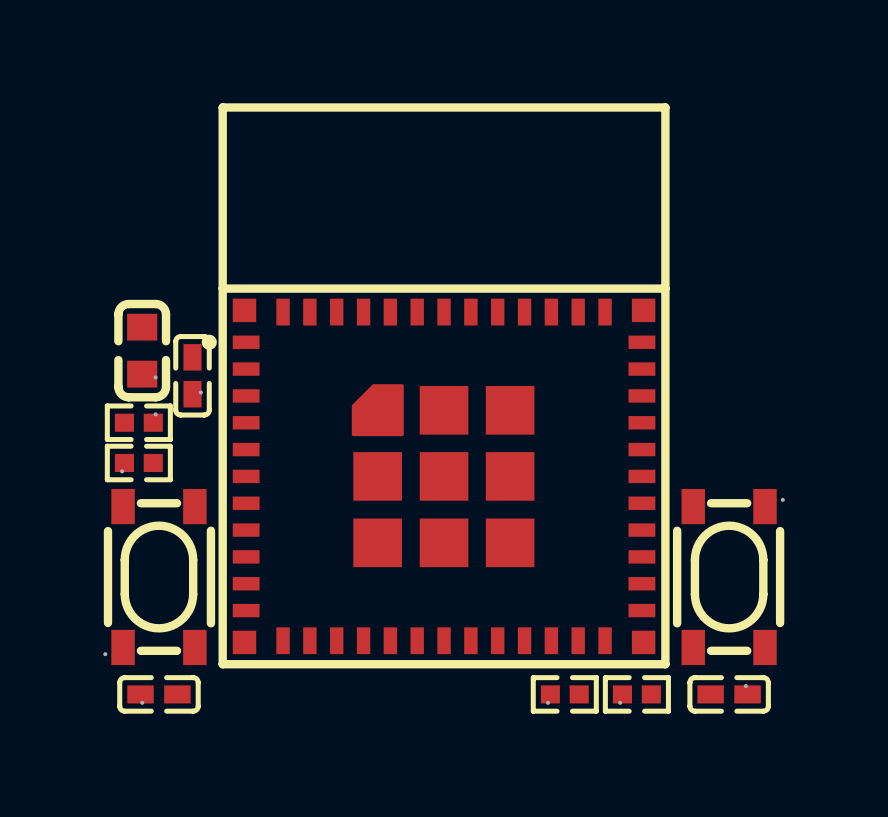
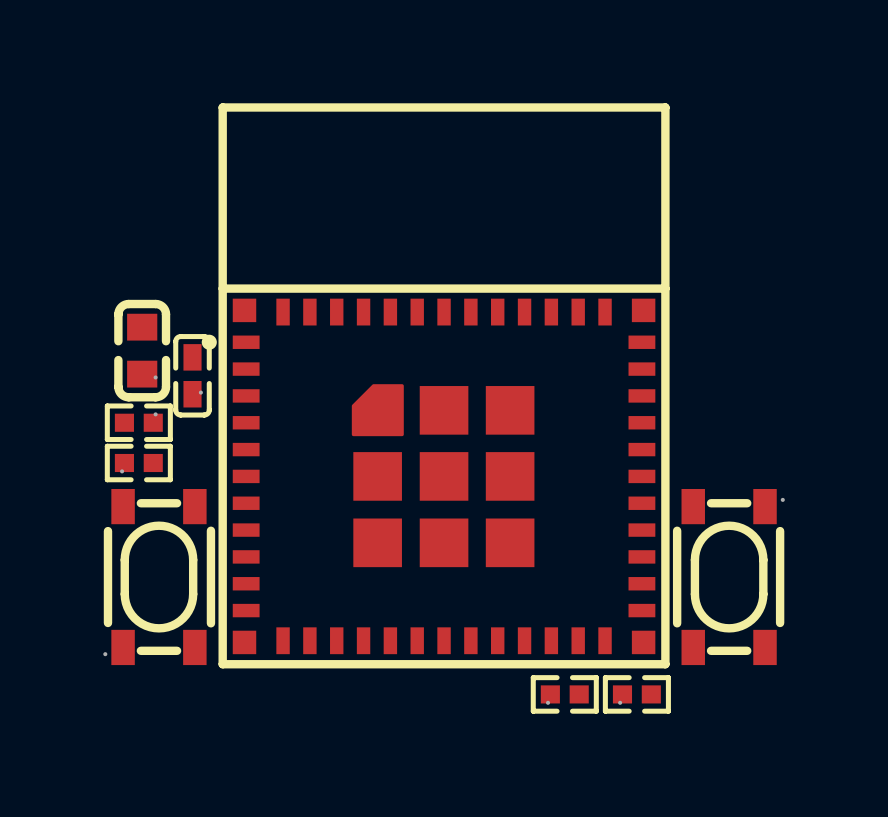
part: (158, 694) -> none
part: (729, 694) -> none

